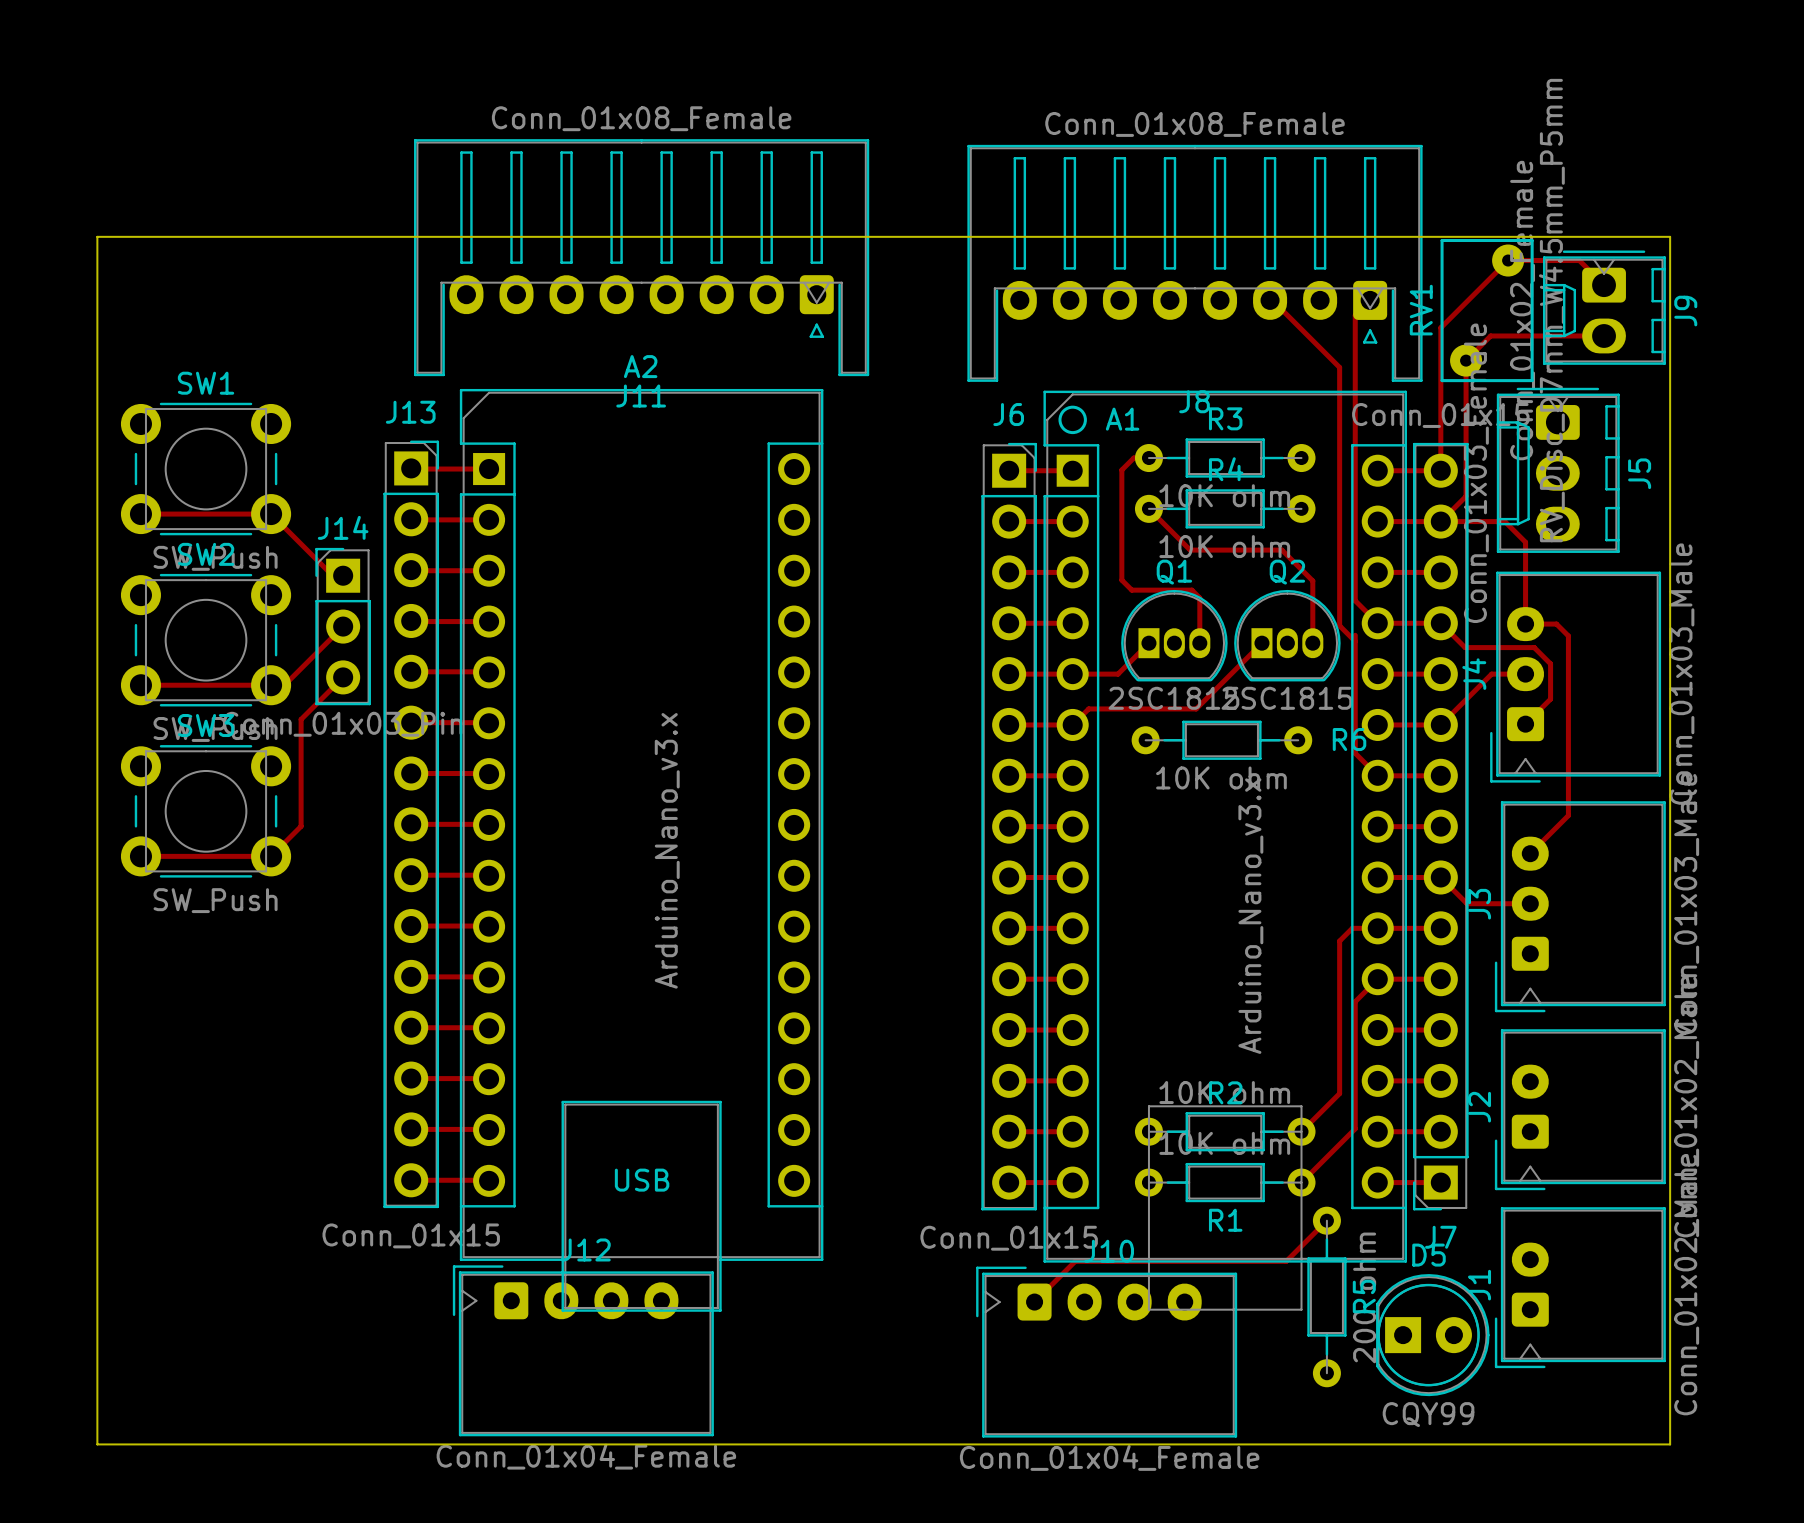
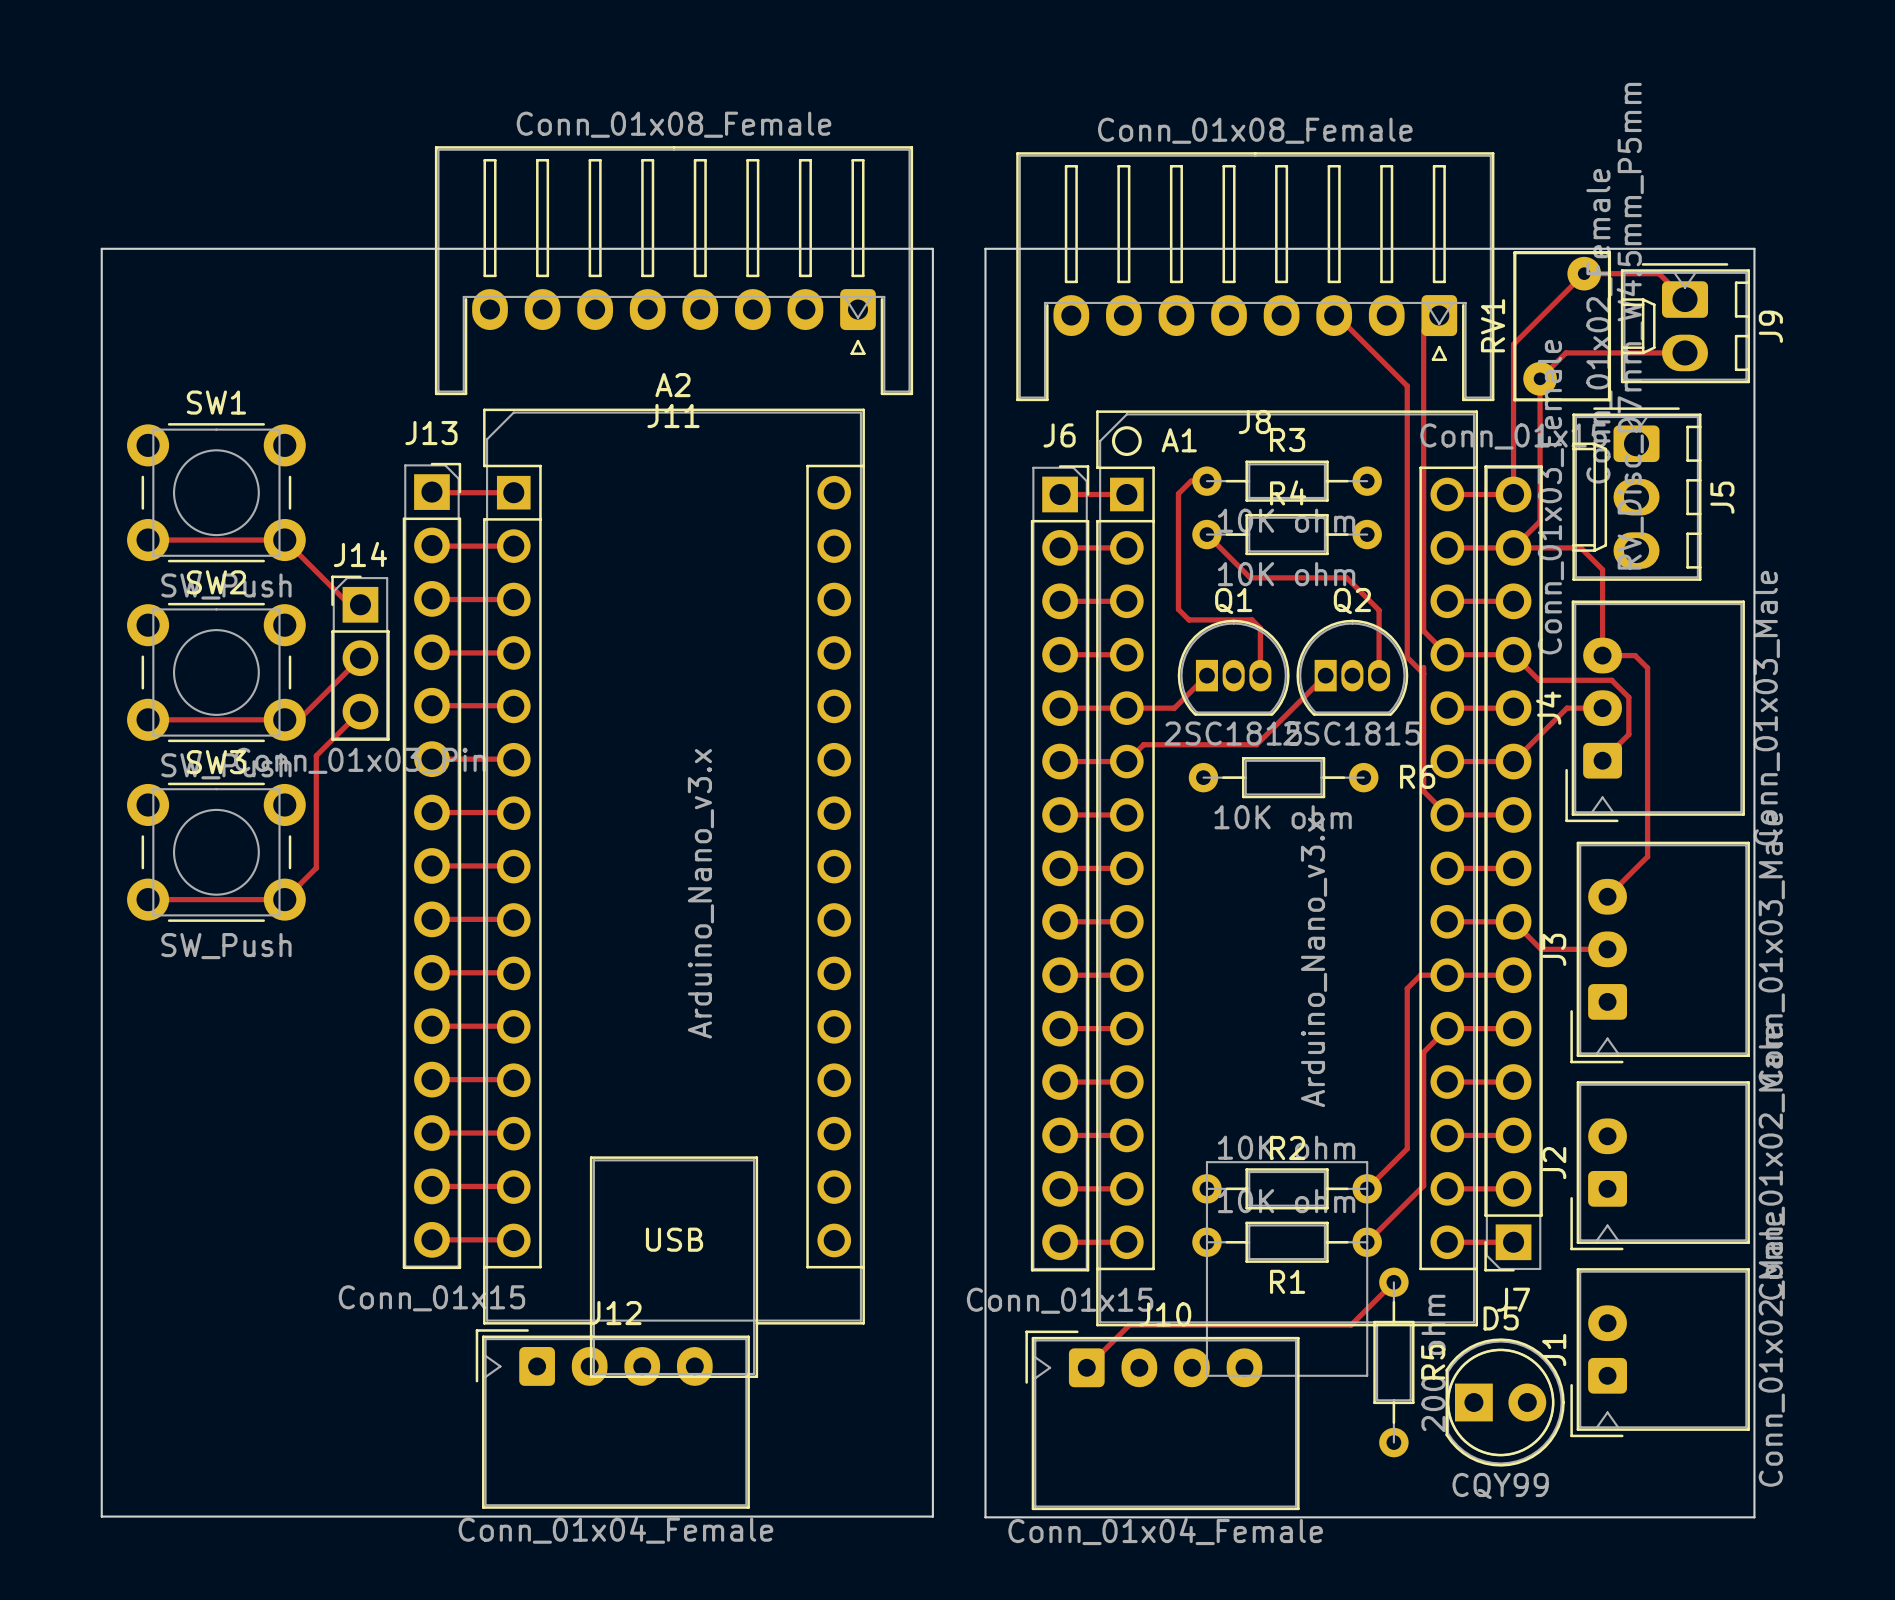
board edge: (97, 236) (97, 1444) (938, 1444) -> (985, 248) (985, 1517)
board edge: (888, 236) (938, 236) -> (932, 248) (932, 1516) (101, 1516) (102, 248)

